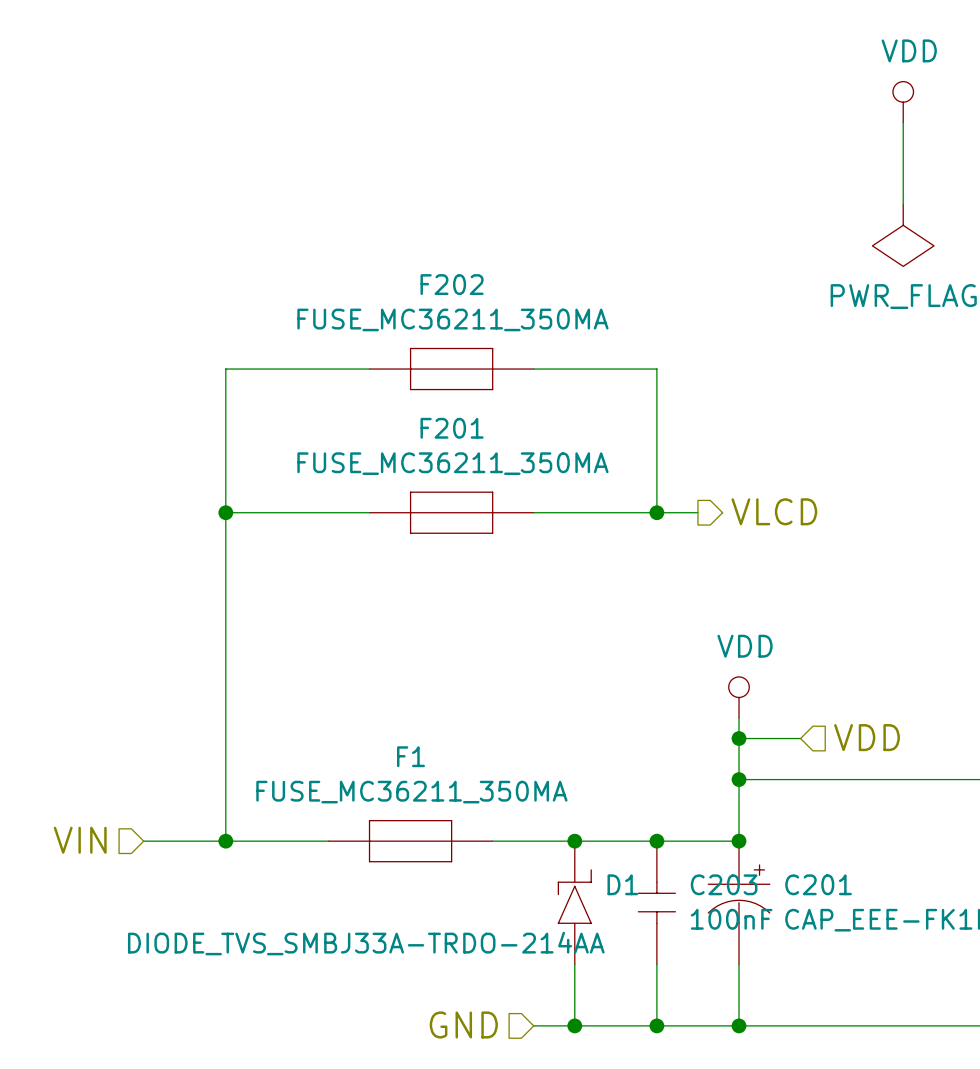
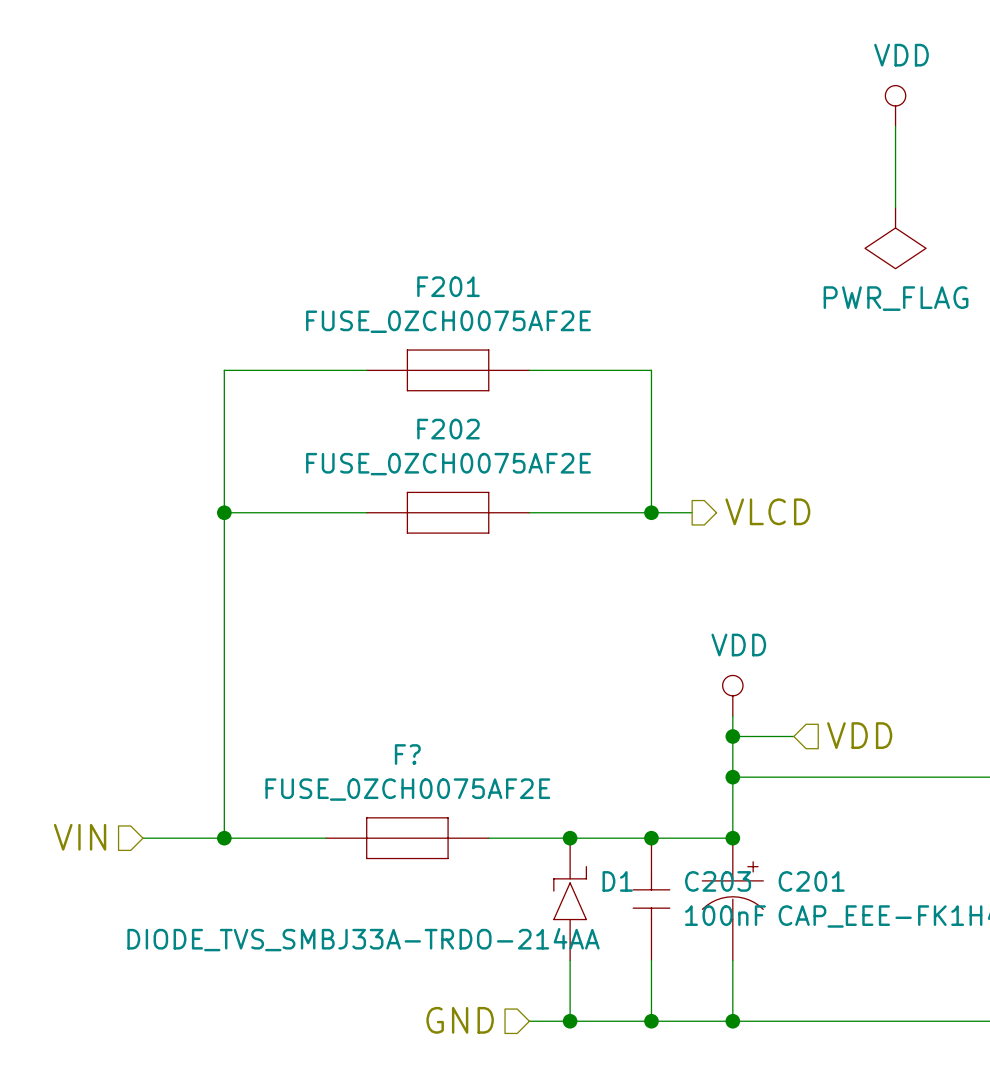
F202 name: F202 (452, 284) -> F201 (448, 286)
F202 value: FUSE_MC36211_350MA (452, 319) -> FUSE_0ZCH0075AF2E (448, 321)
F201 name: F201 (452, 428) -> F202 (448, 429)
F201 value: FUSE_MC36211_350MA (452, 463) -> FUSE_0ZCH0075AF2E (448, 464)
F1 name: F1 (411, 756) -> F? (407, 754)
F1 value: FUSE_MC36211_350MA (411, 792) -> FUSE_0ZCH0075AF2E (407, 789)

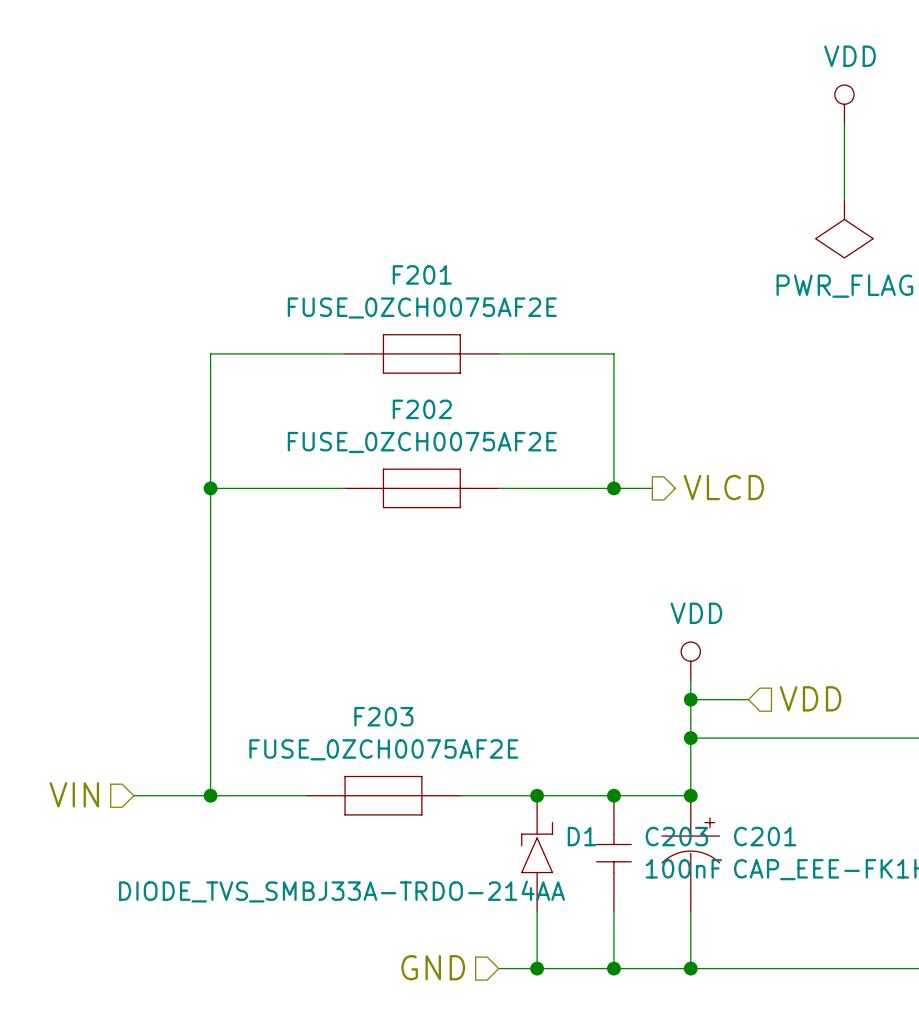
F? name: F? (407, 754) -> F203 (383, 716)

